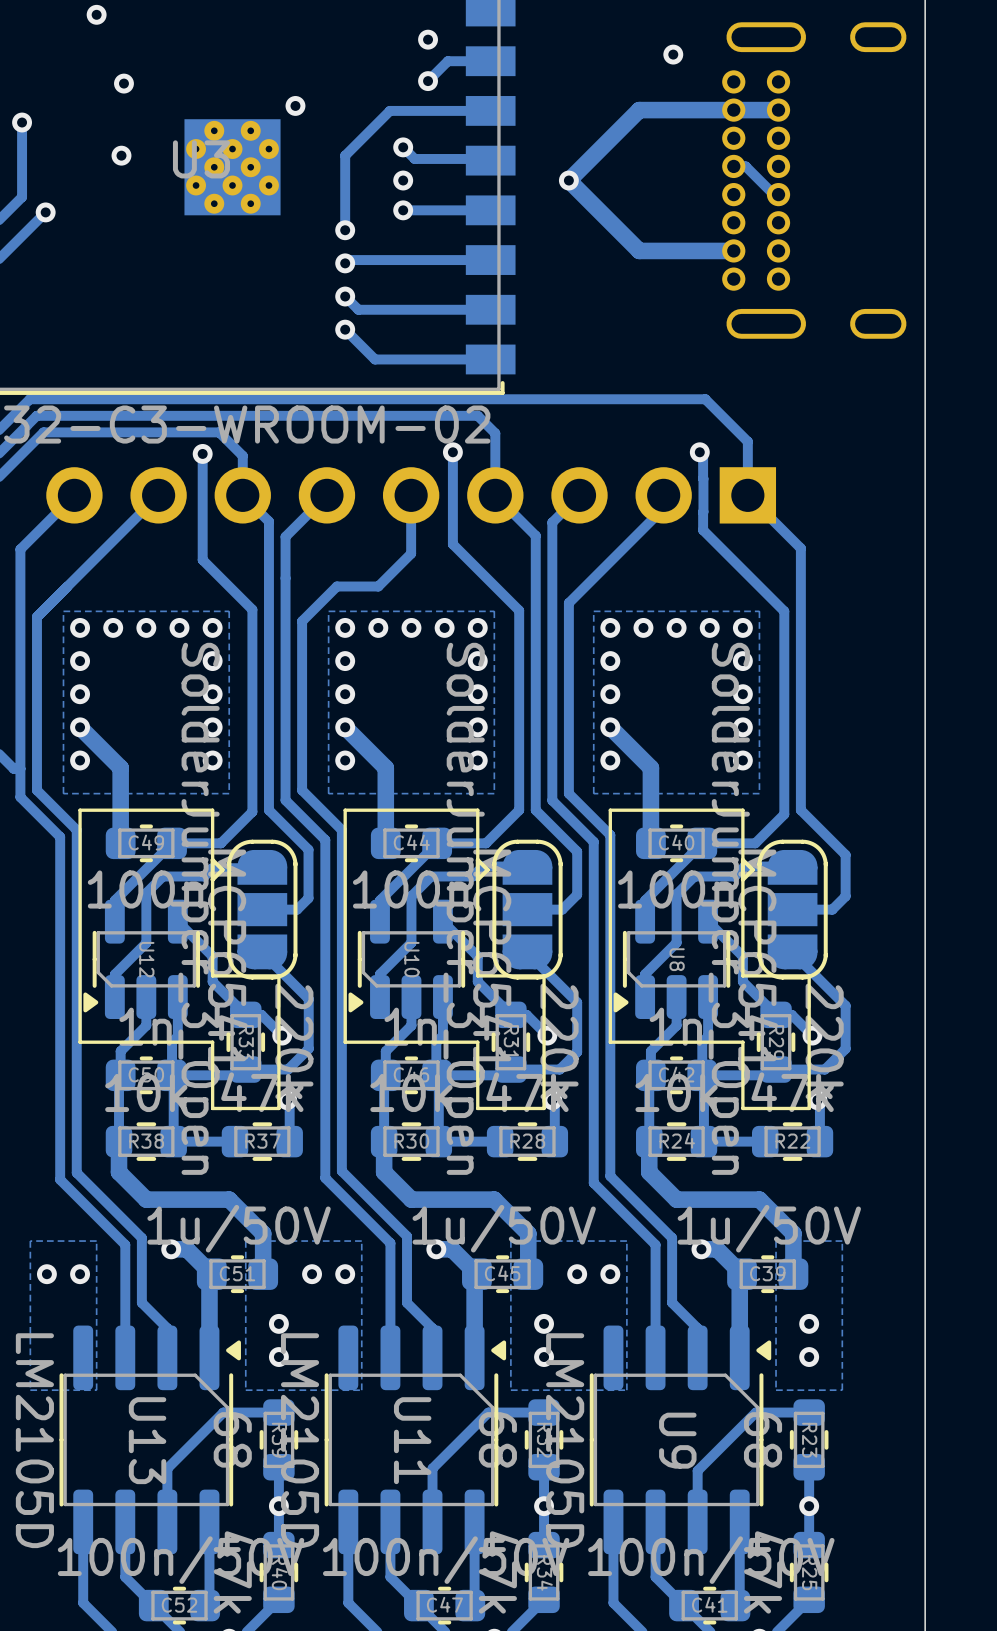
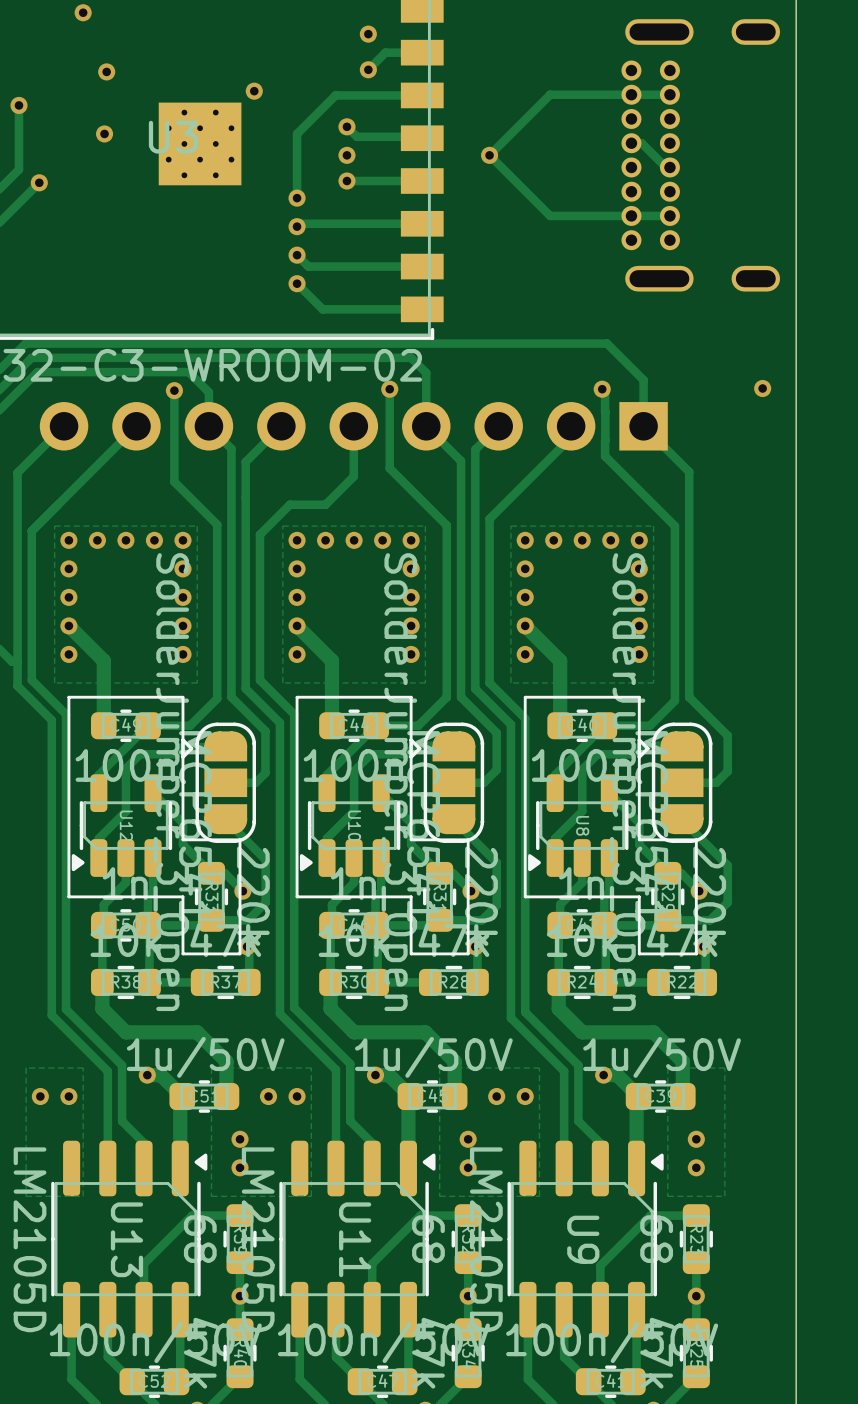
via: (673, 54) -> none
track width: thick (778, 110) (639, 110) (568, 180) (639, 250) (733, 250) -> thin (669, 94) (550, 94) (489, 155) (550, 215) (631, 215)
track: none -> (669, 215) (631, 215)
via: none -> (762, 388)

